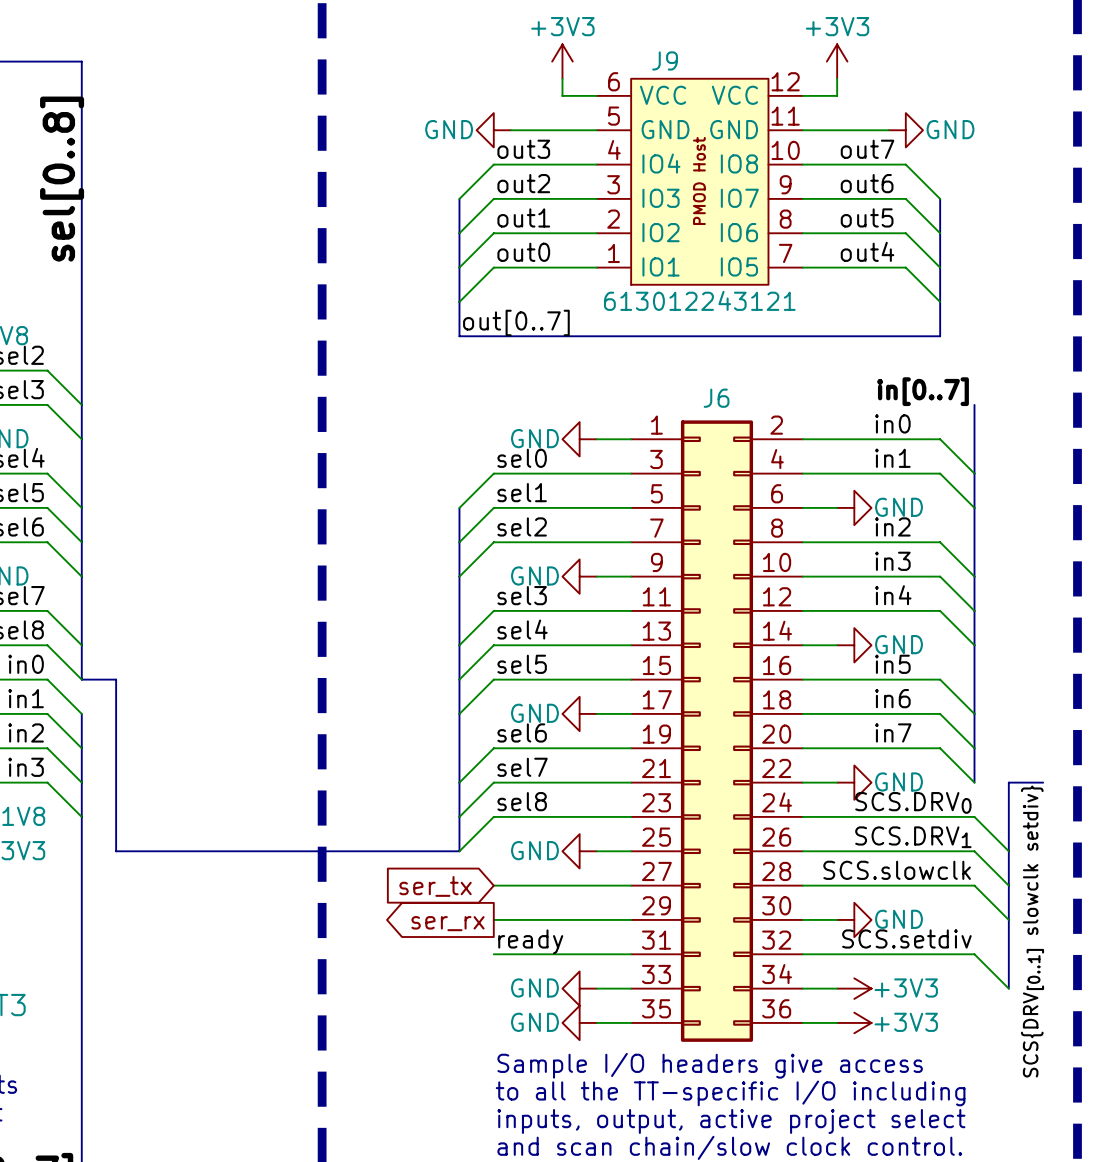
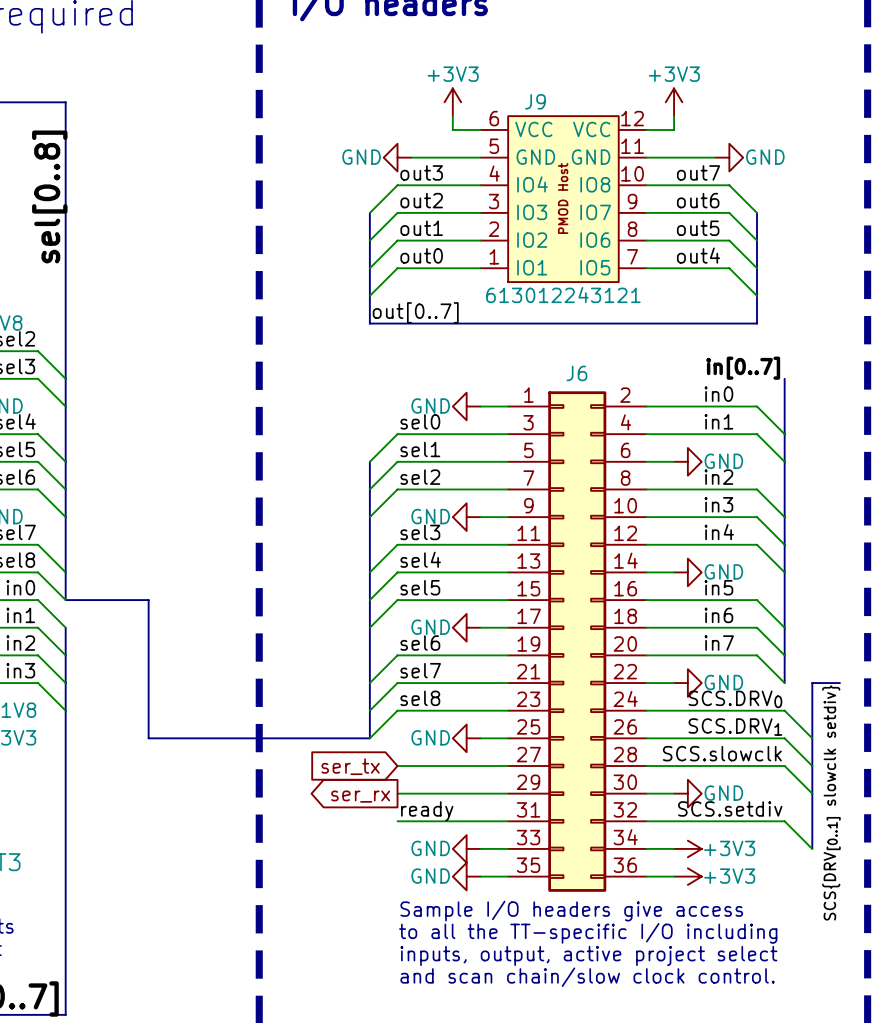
bus: (116, 679) (116, 851) (184, 851) -> (93, 600) (148, 600) (148, 738)

